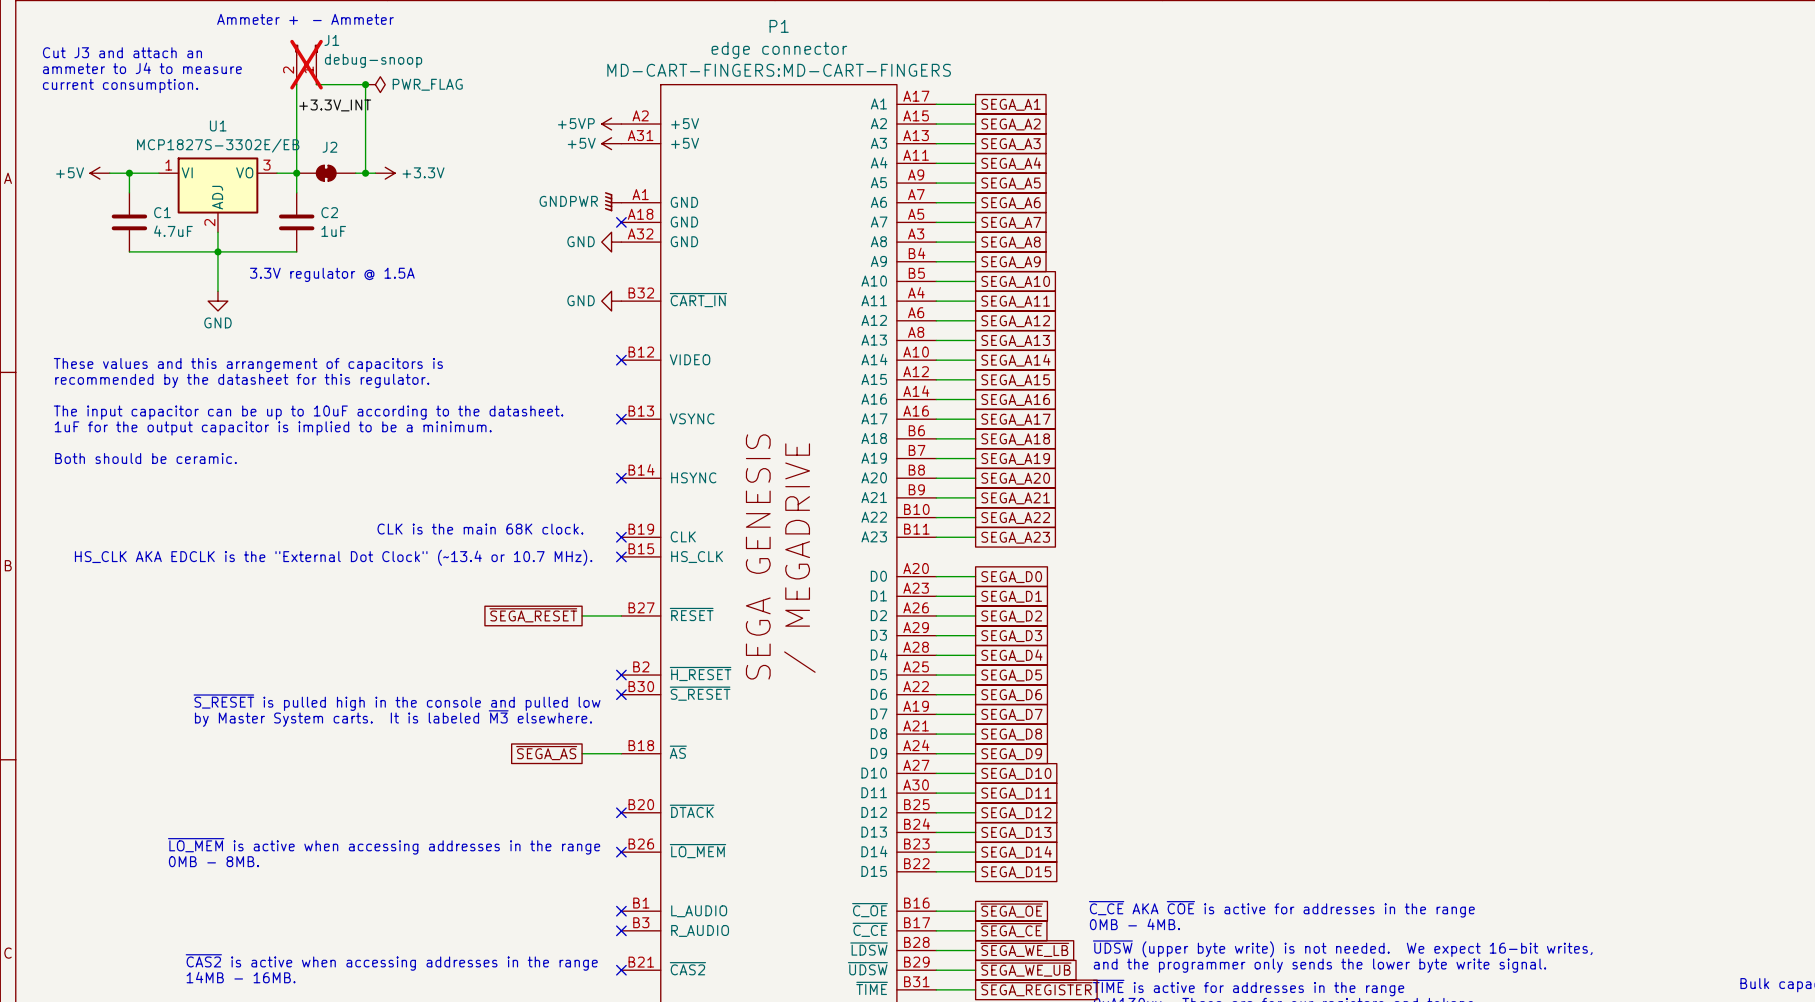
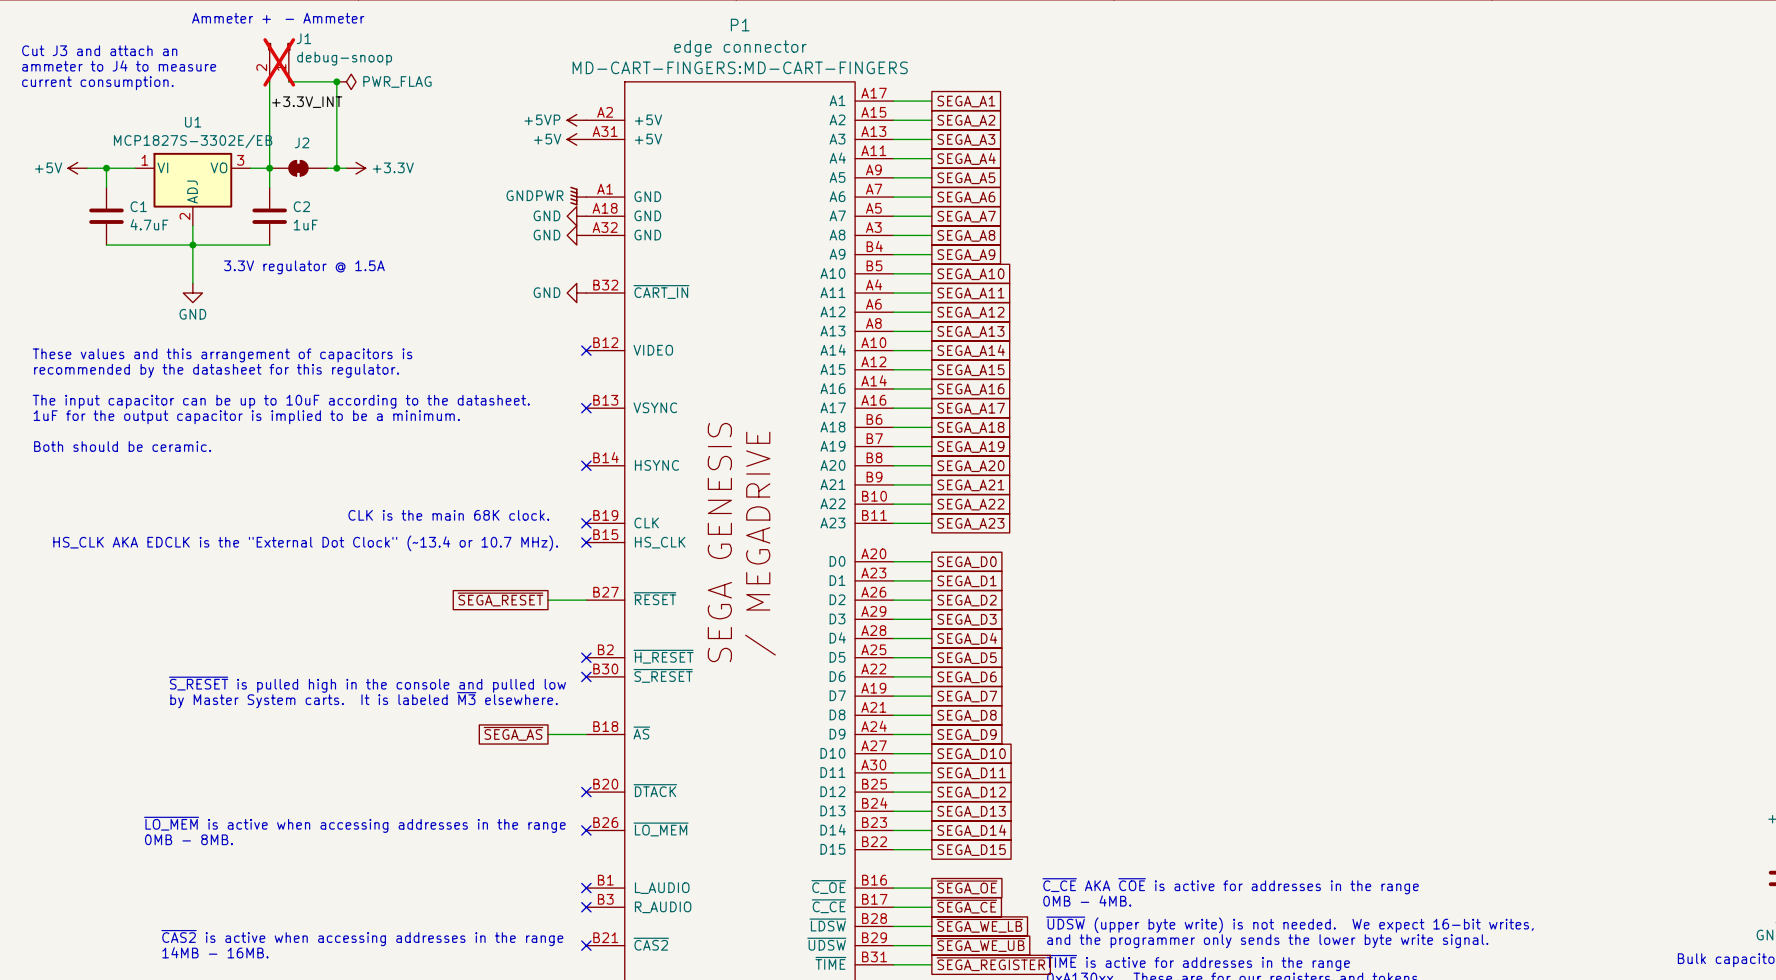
power symbol: none -> GND (576, 216)
no-connect mark: (621, 222) -> none

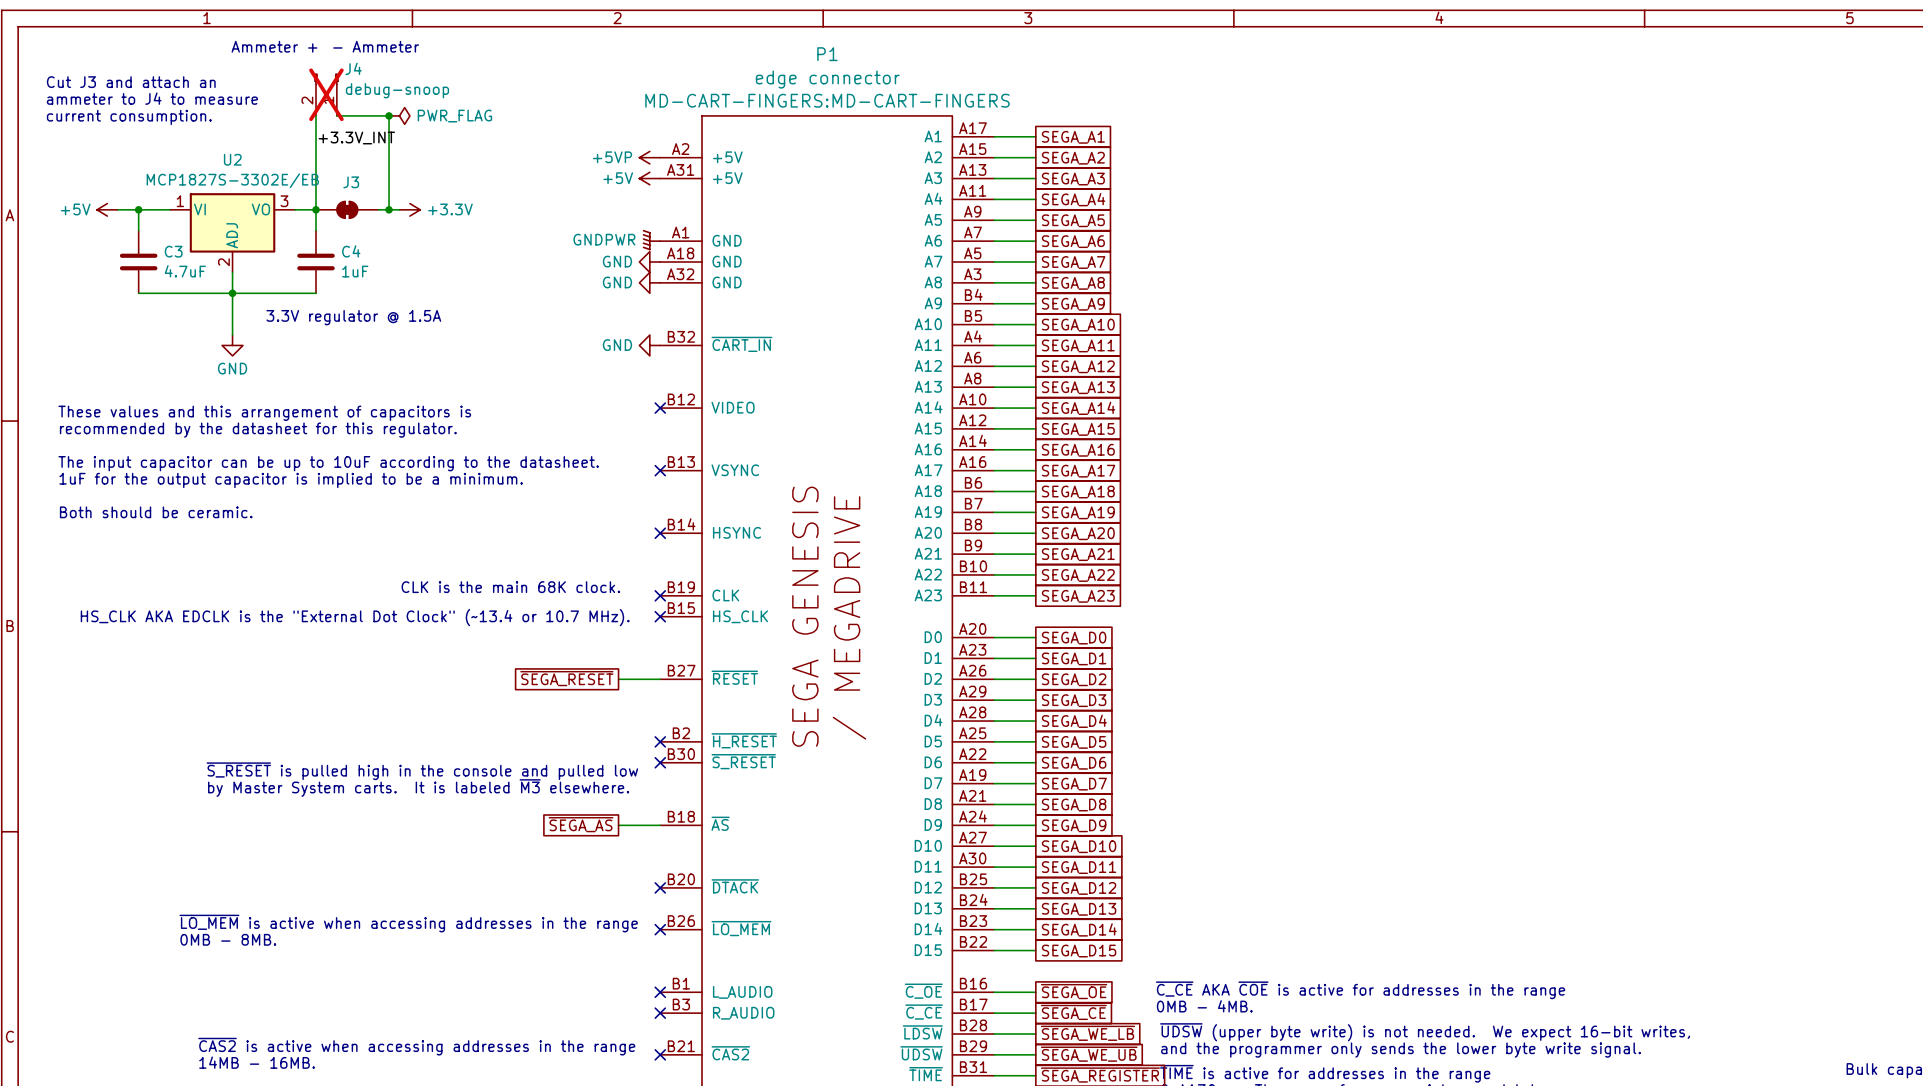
J1 name: J1 (303, 38) -> J4 (353, 68)
U1 name: U1 (193, 122) -> U2 (232, 159)
J2 name: J2 (302, 142) -> J3 (351, 182)
C1 name: C1 (138, 206) -> C3 (173, 251)
C2 name: C2 (301, 206) -> C4 (351, 251)

